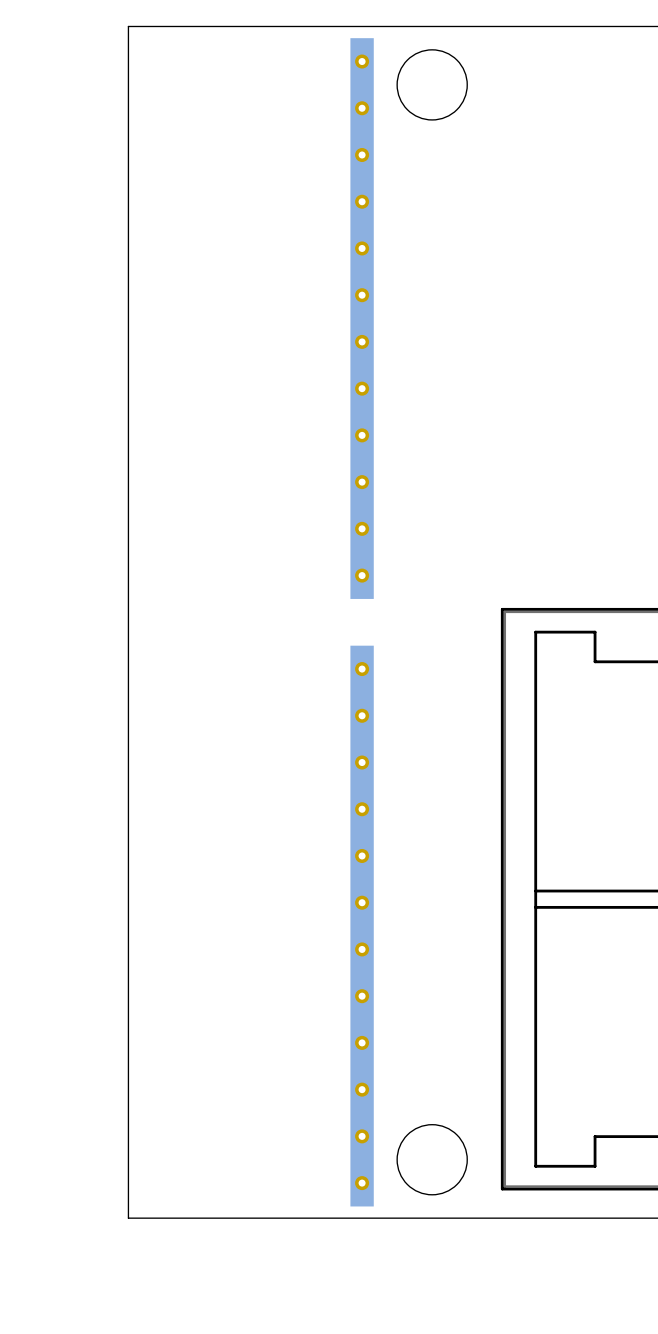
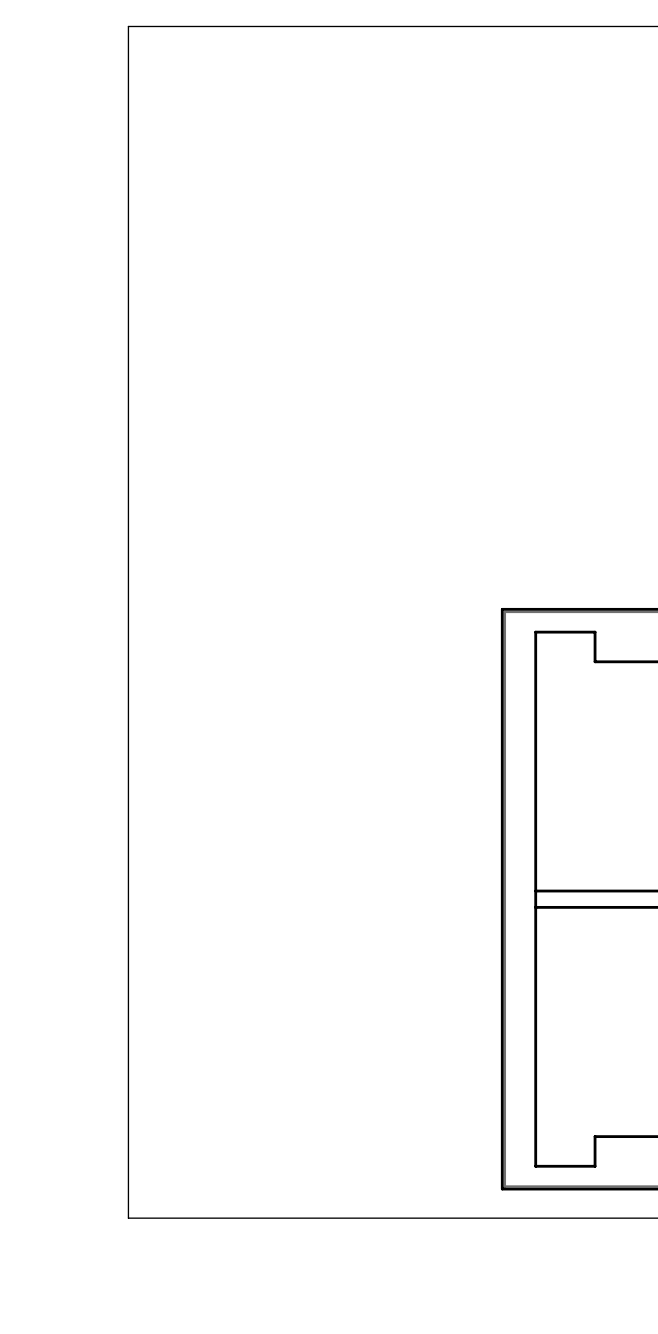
round board edge: [396, 49, 468, 121] -> none
part: (362, 622) -> none
round board edge: [396, 1124, 468, 1196] -> none

